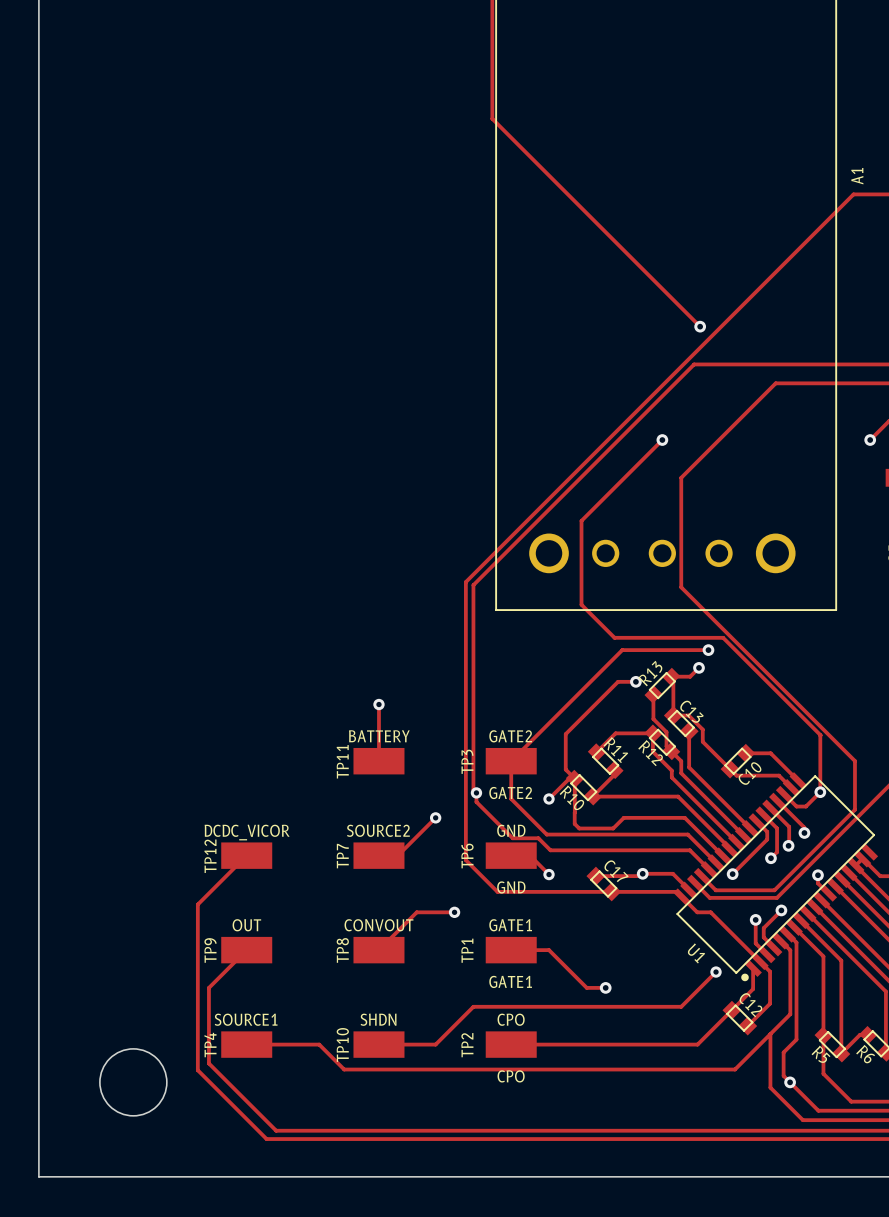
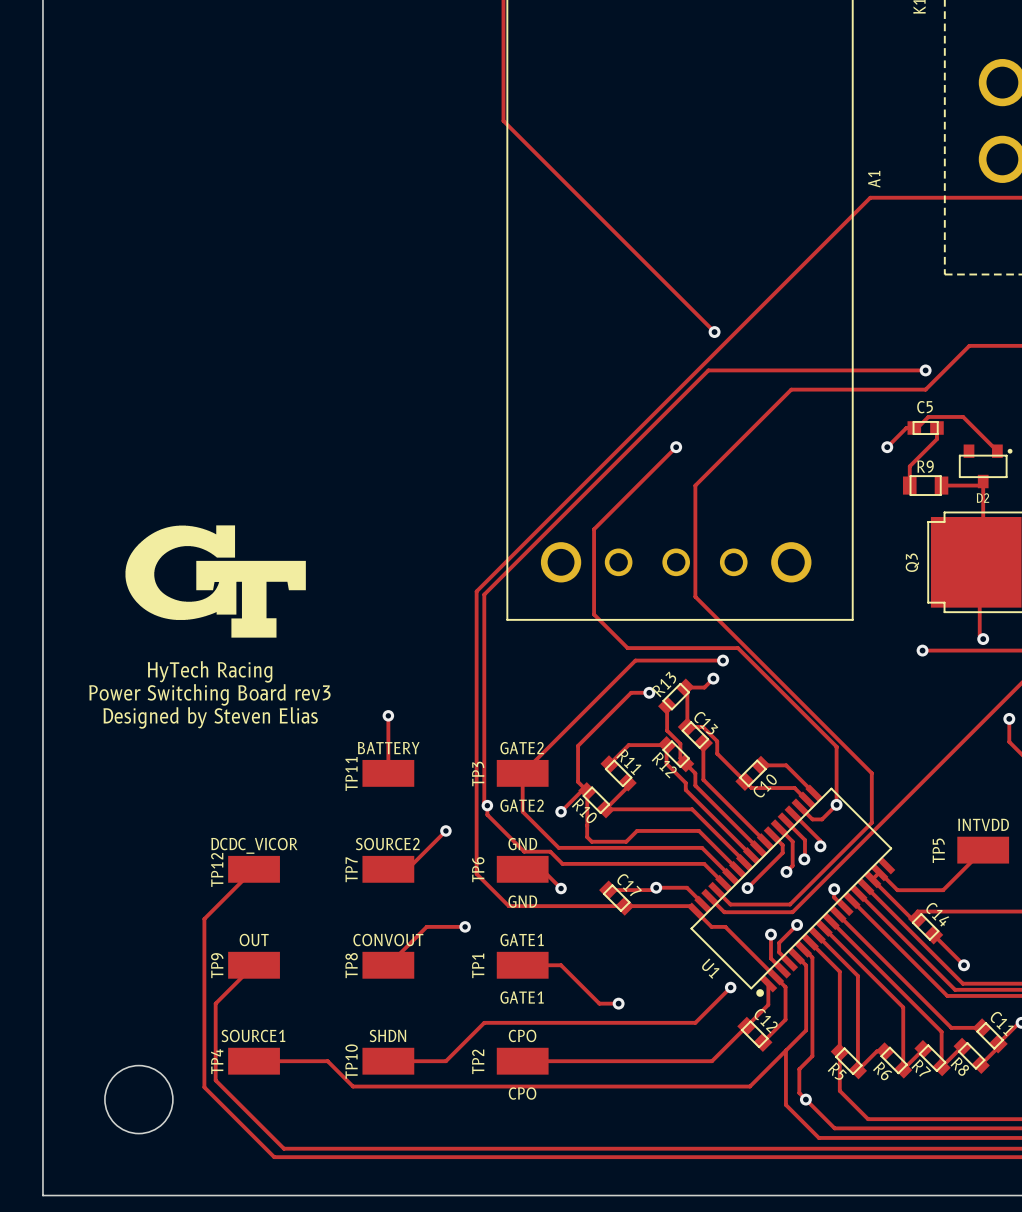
drawing: none -> [125, 525, 306, 638]
text: none -> HyTech Racing (210, 671)
text: none -> Power Switching Board rev3 (209, 694)
text: none -> Designed by Steven Elias (210, 717)

